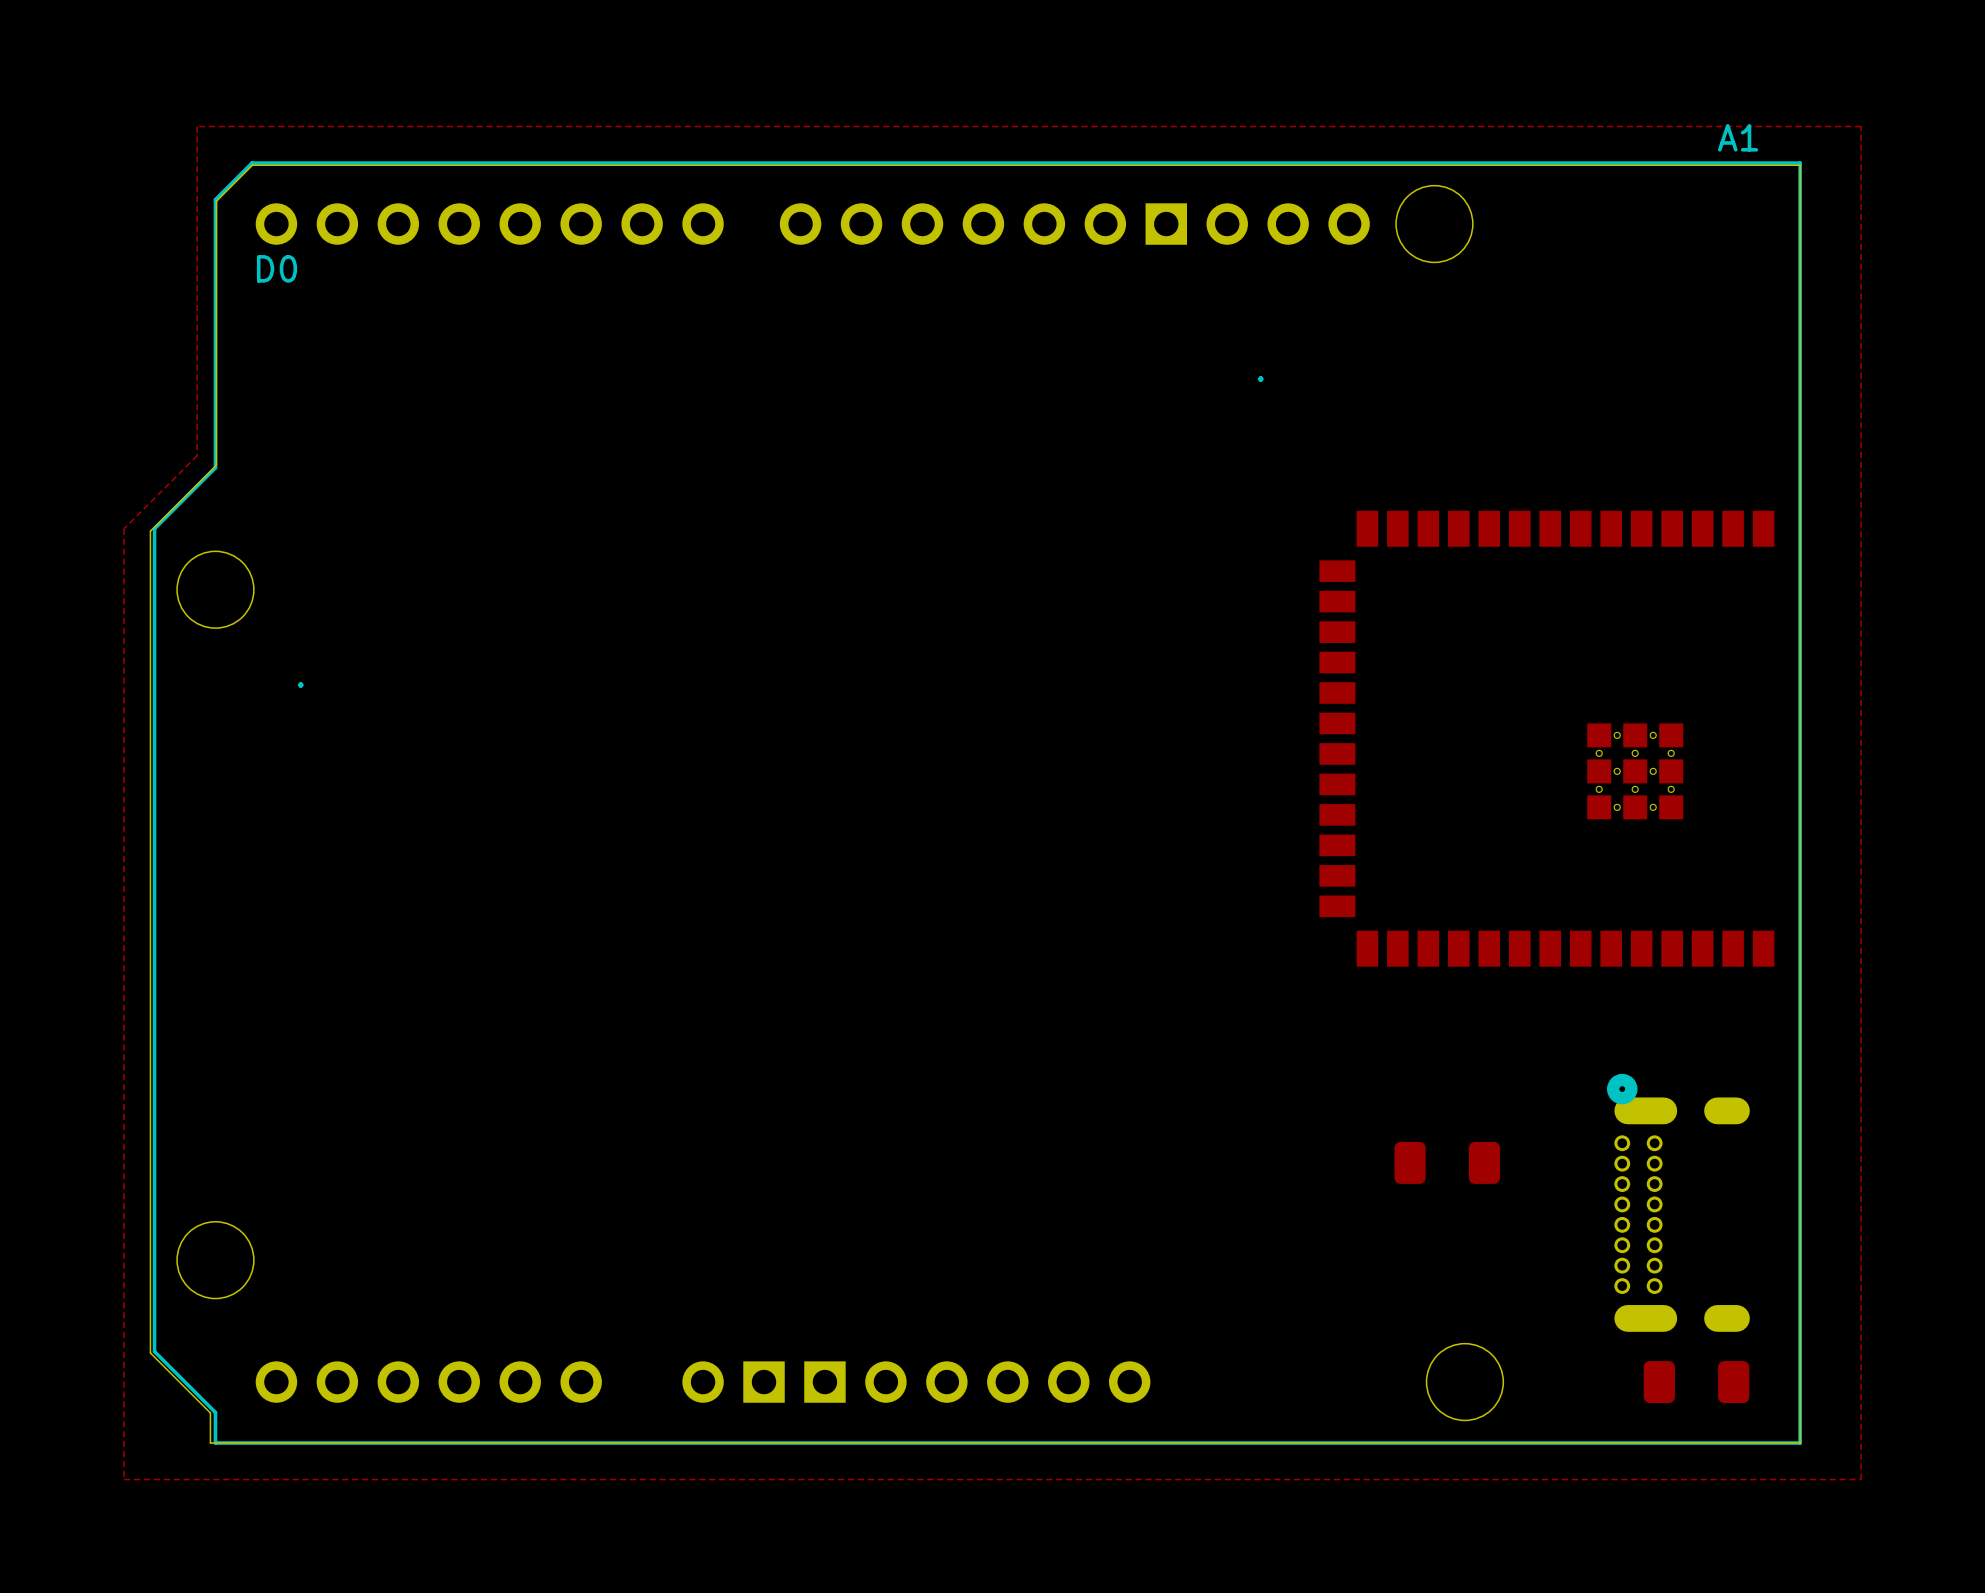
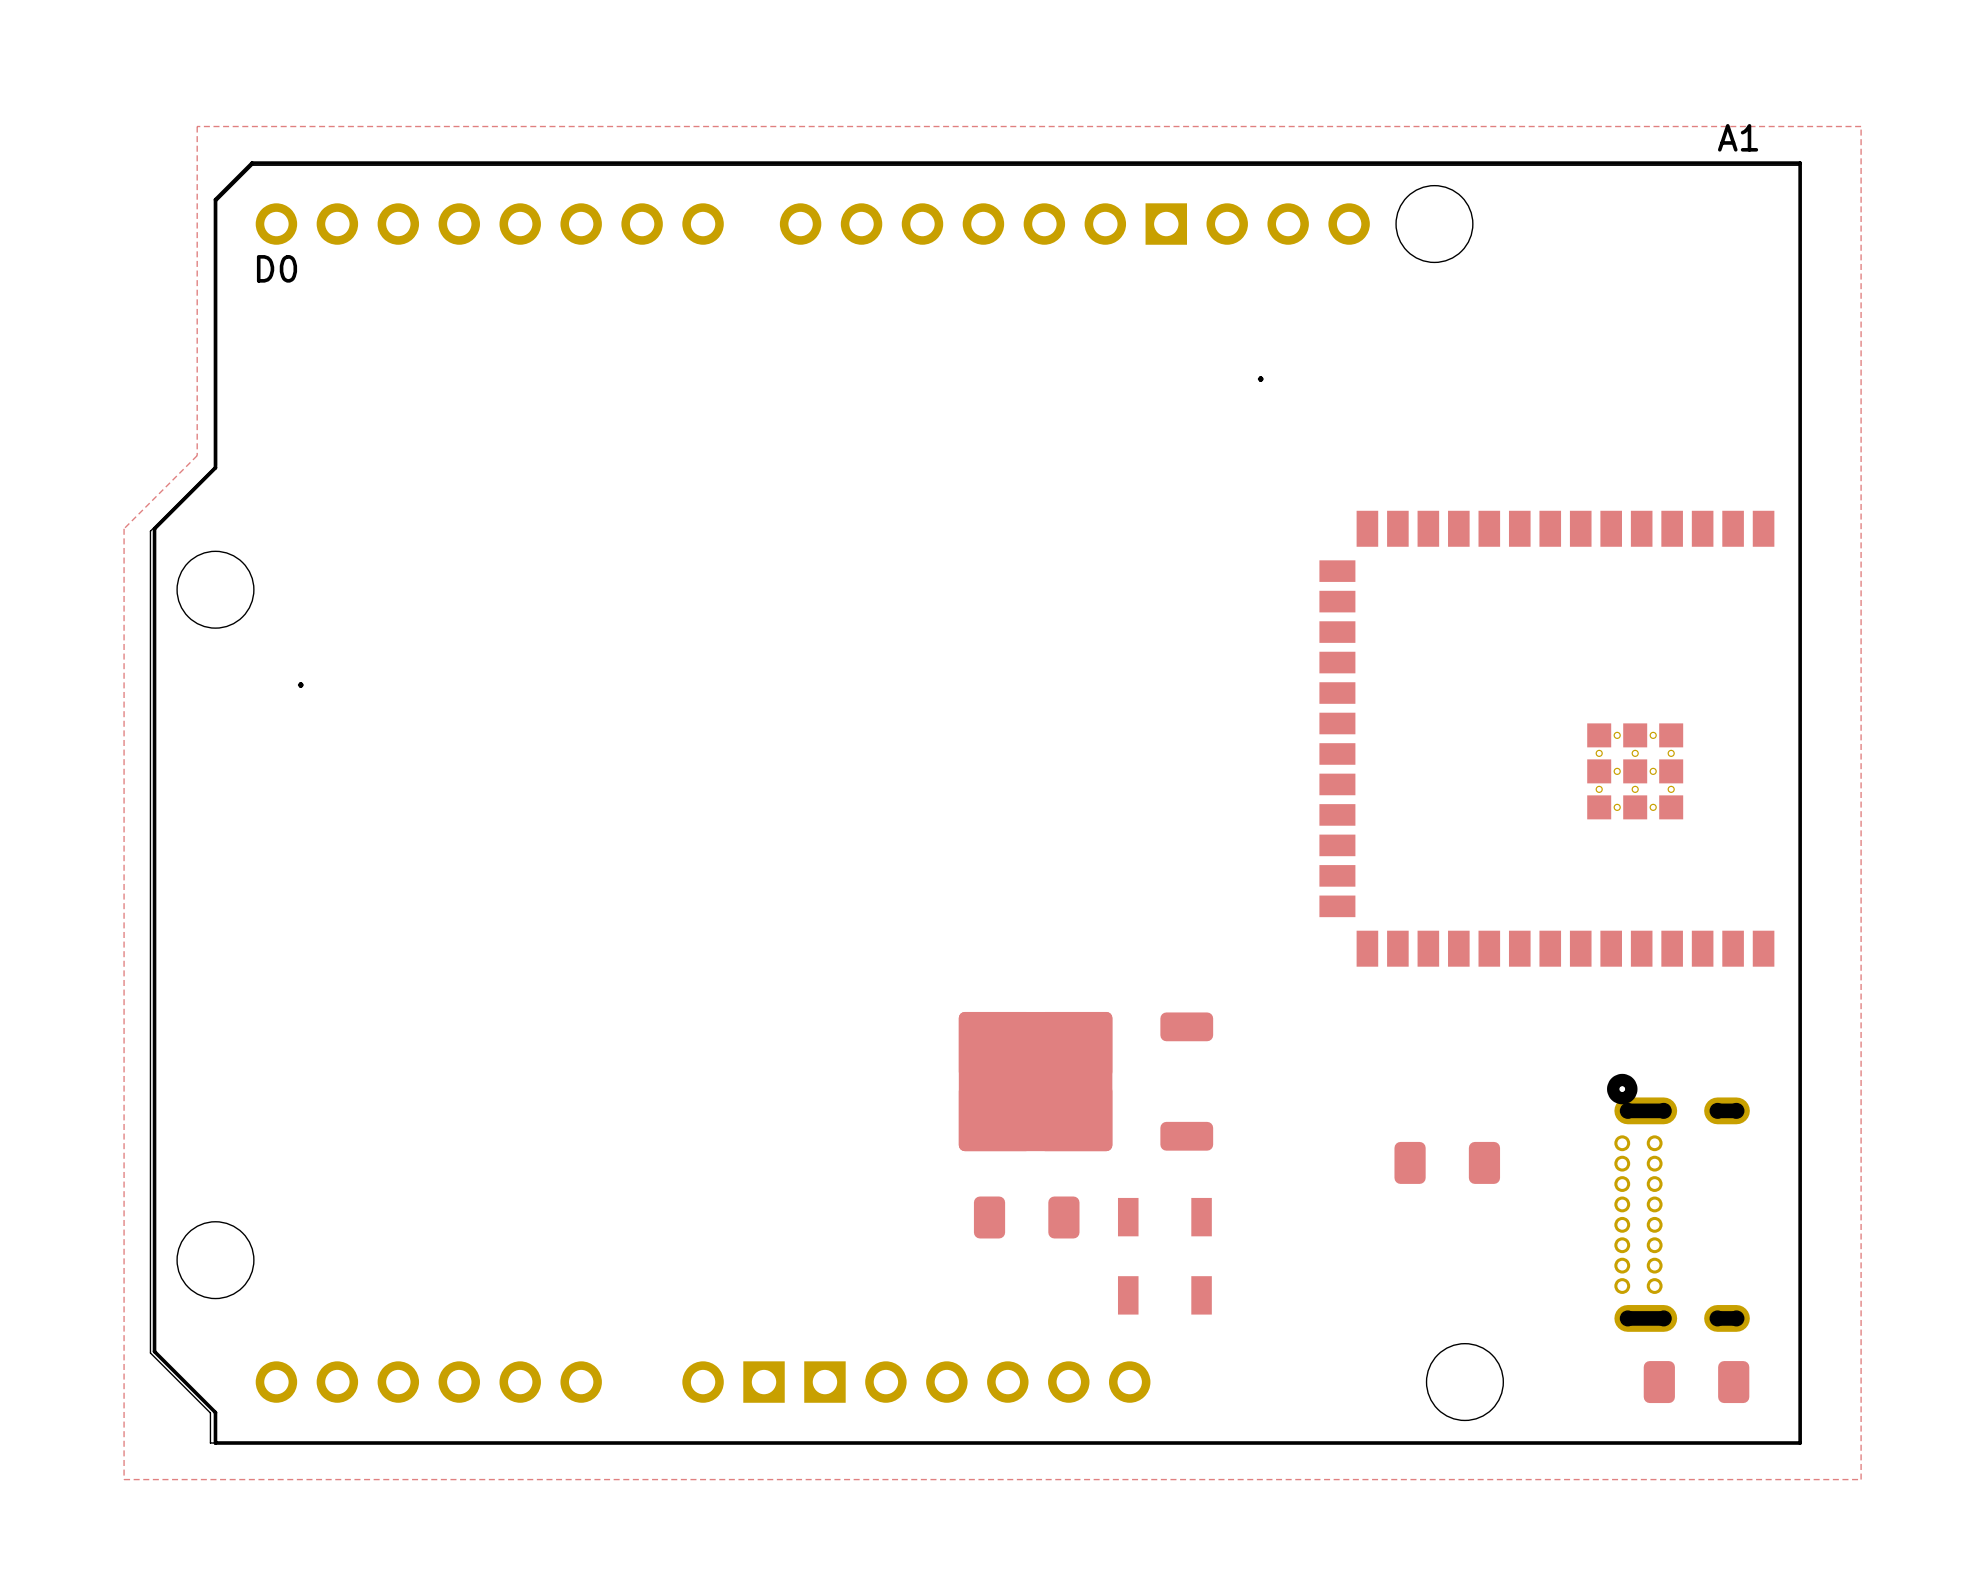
part: none -> (1085, 1081)
part: none -> (1026, 1217)
part: none -> (1164, 1217)
part: none -> (1164, 1295)

